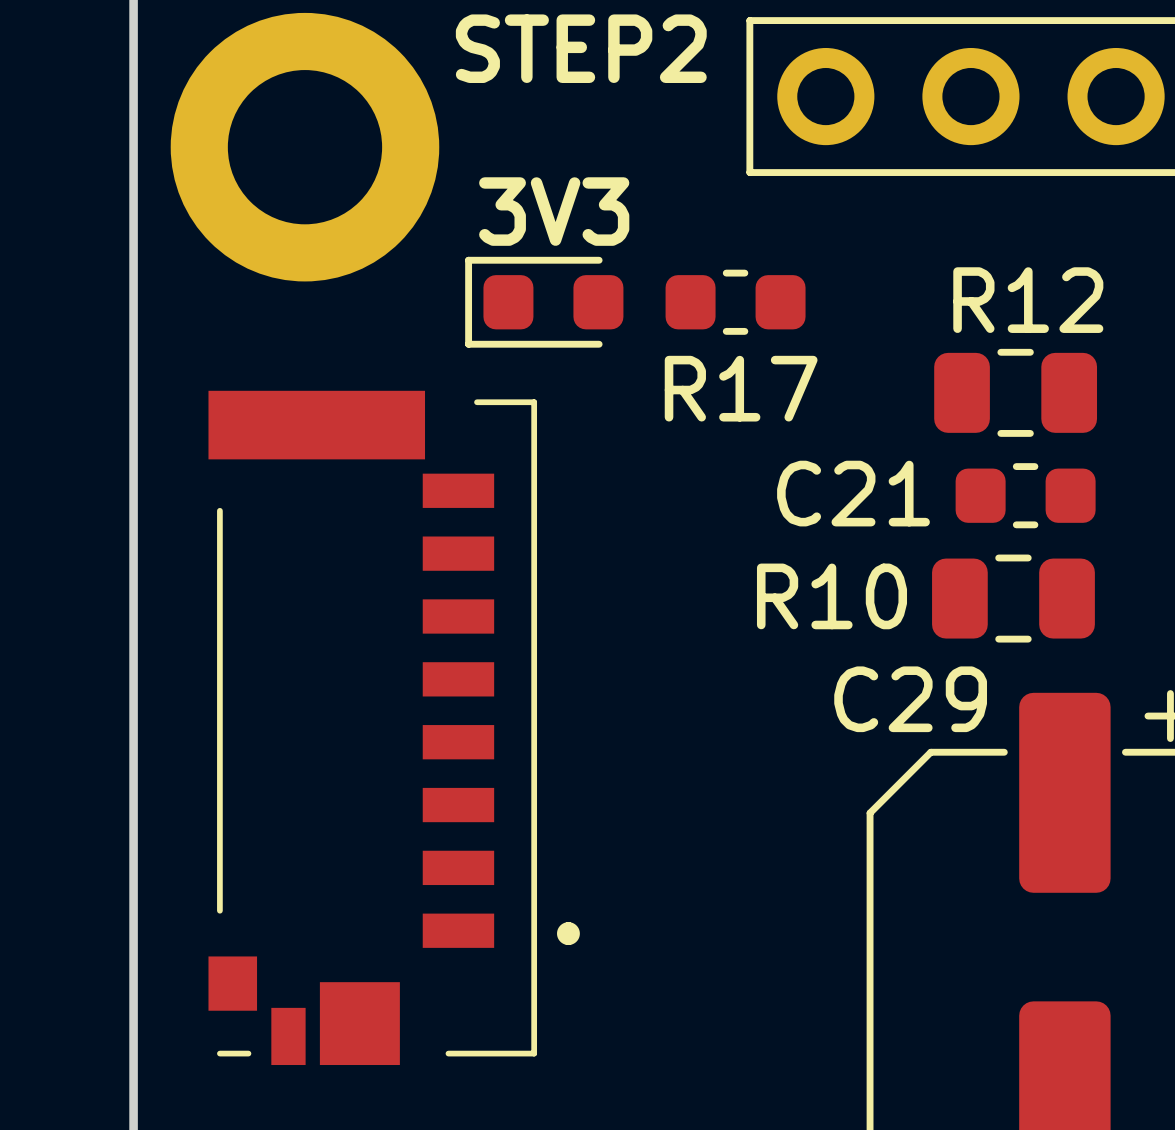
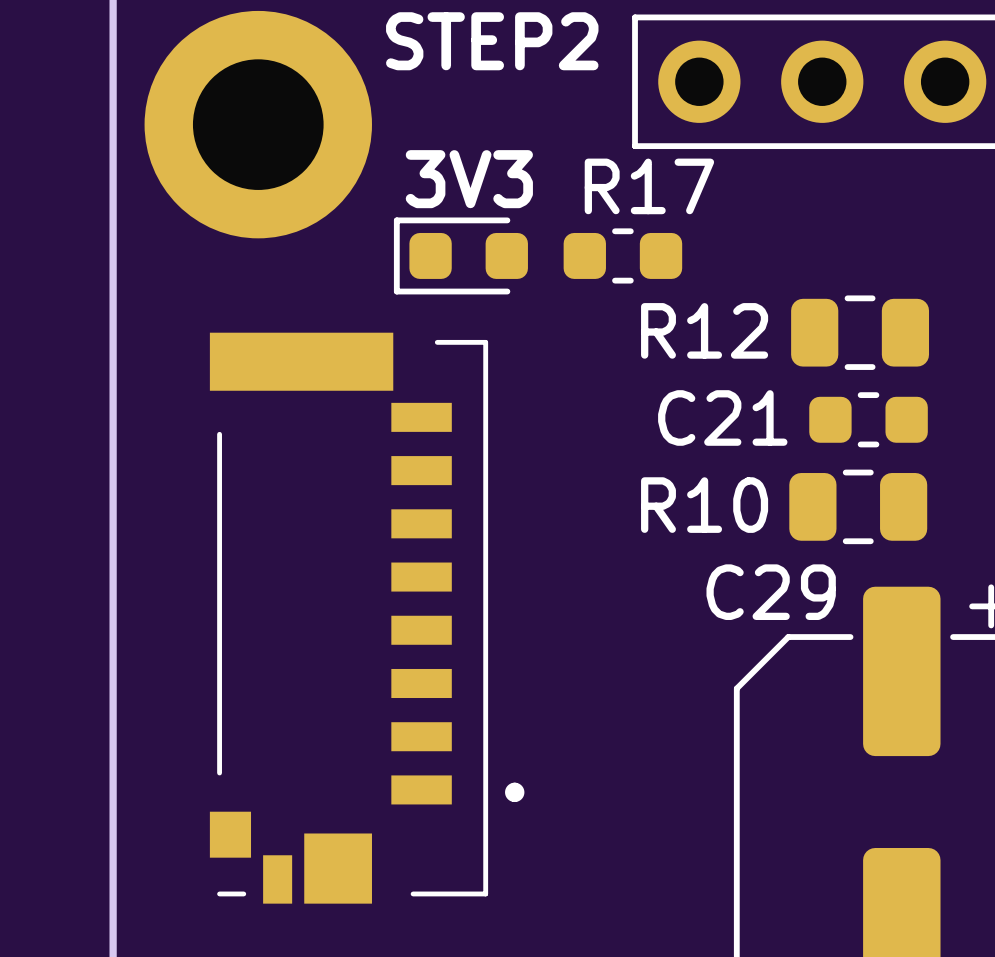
R12 name position: R12 (1028, 300) -> R12 (704, 330)
R17 name position: R17 (741, 388) -> R17 (649, 186)
part position: (394, 727) -> (367, 618)

